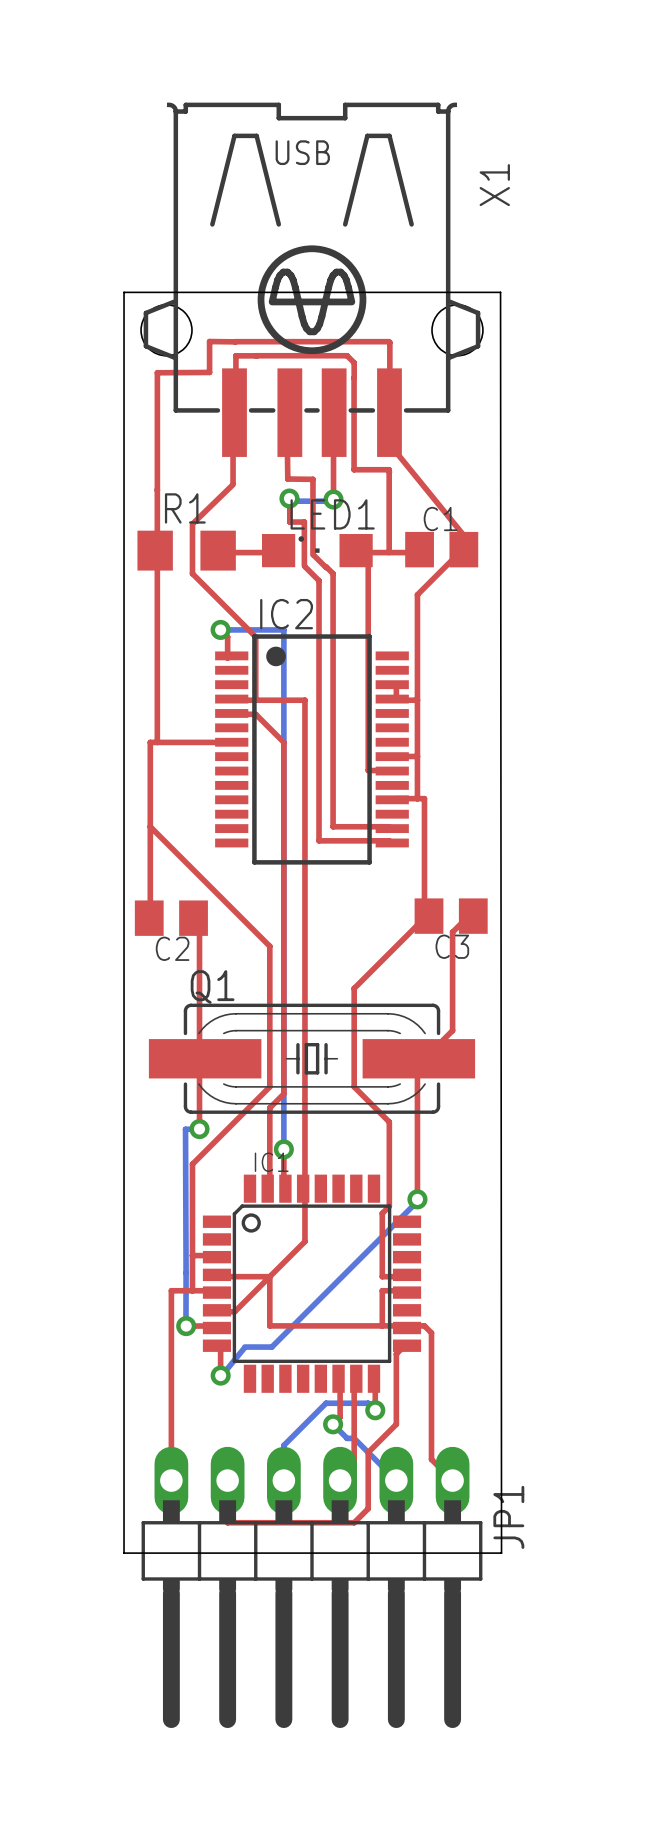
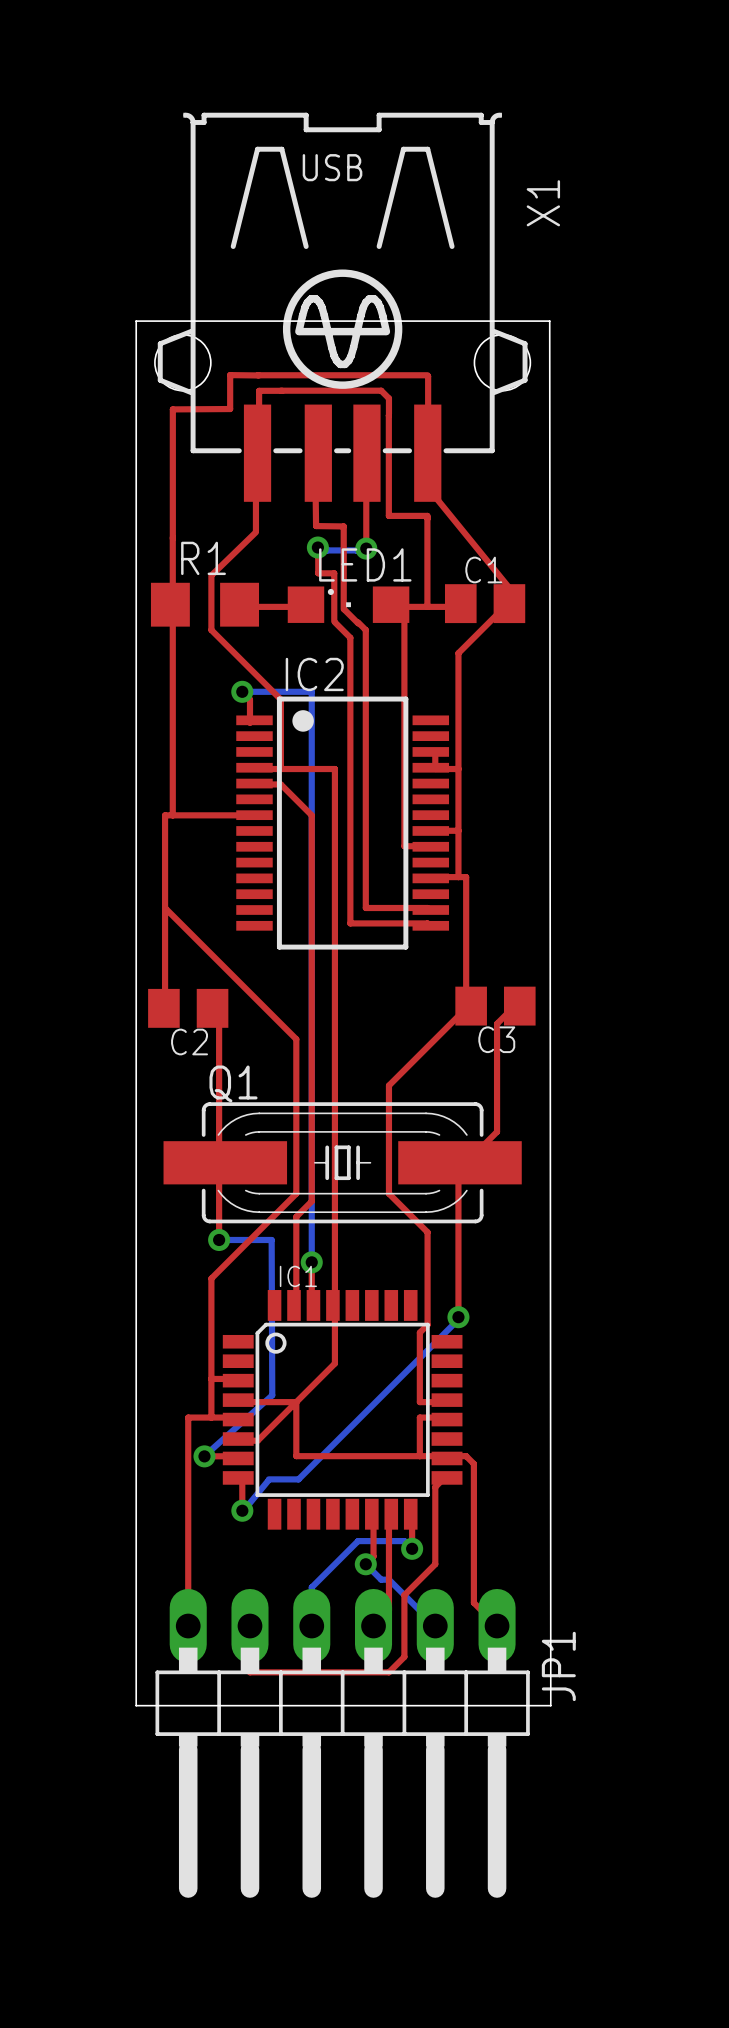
bottom track: (199, 1129) (185, 1129) (185, 1325) -> (219, 1239) (271, 1239) (272, 1395) (204, 1456)

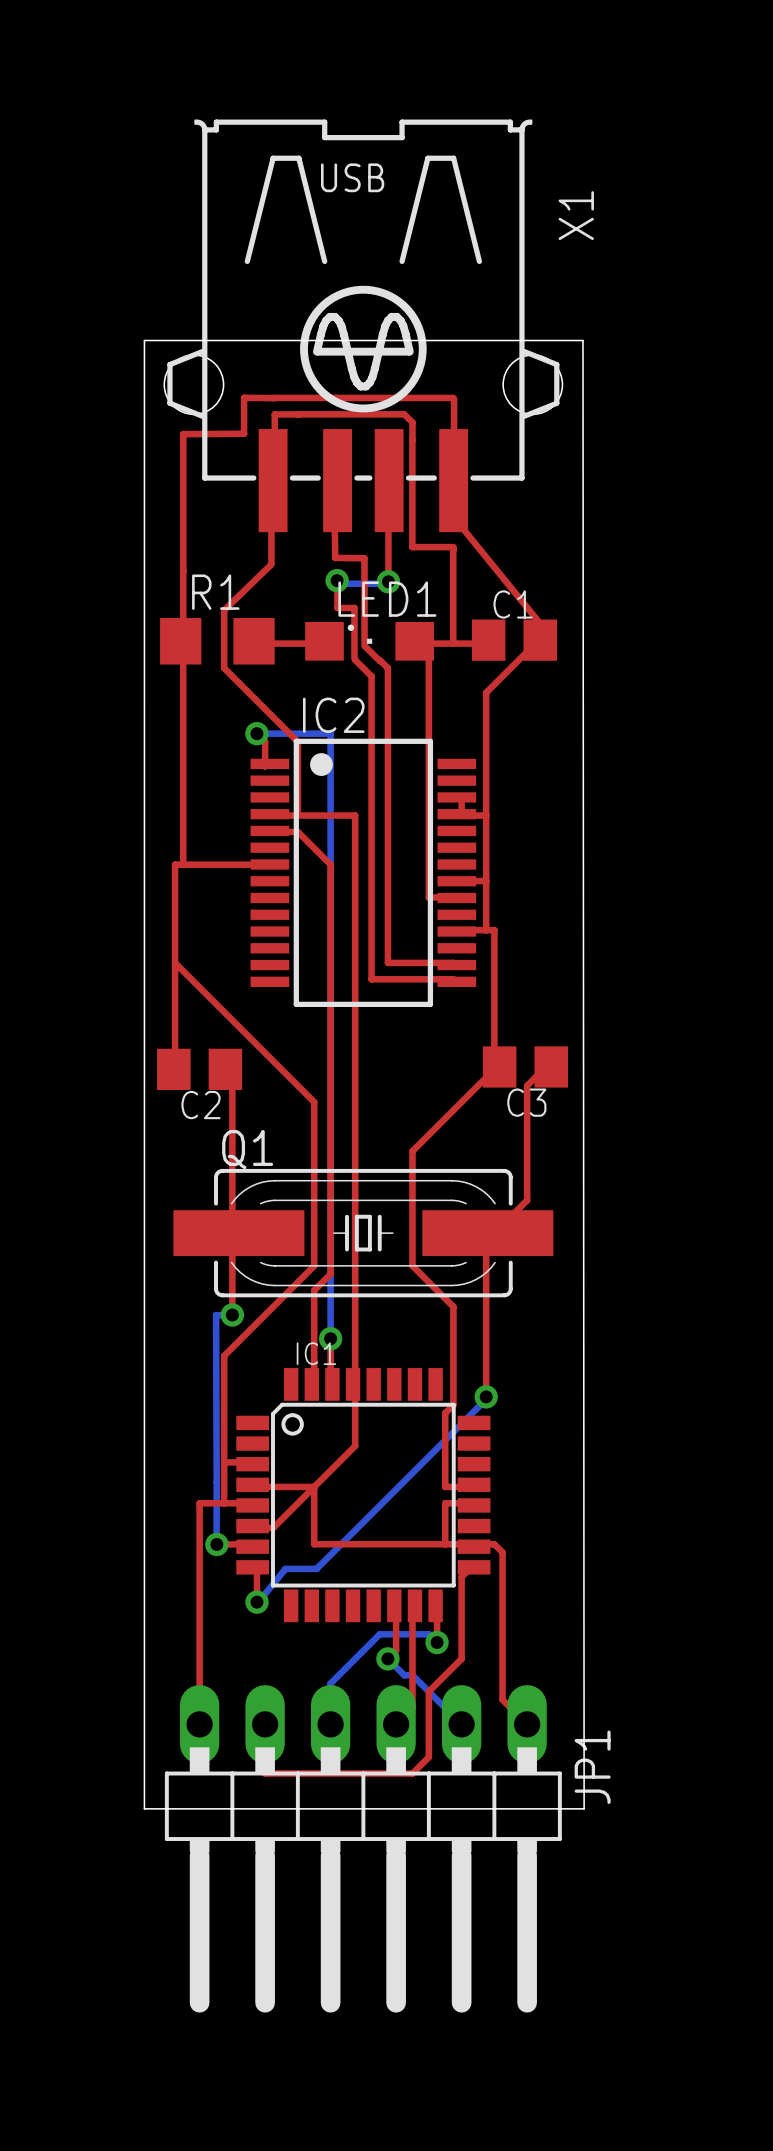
bottom track: (219, 1239) (271, 1239) (272, 1395) (204, 1456) -> (232, 1315) (216, 1315) (216, 1544)

